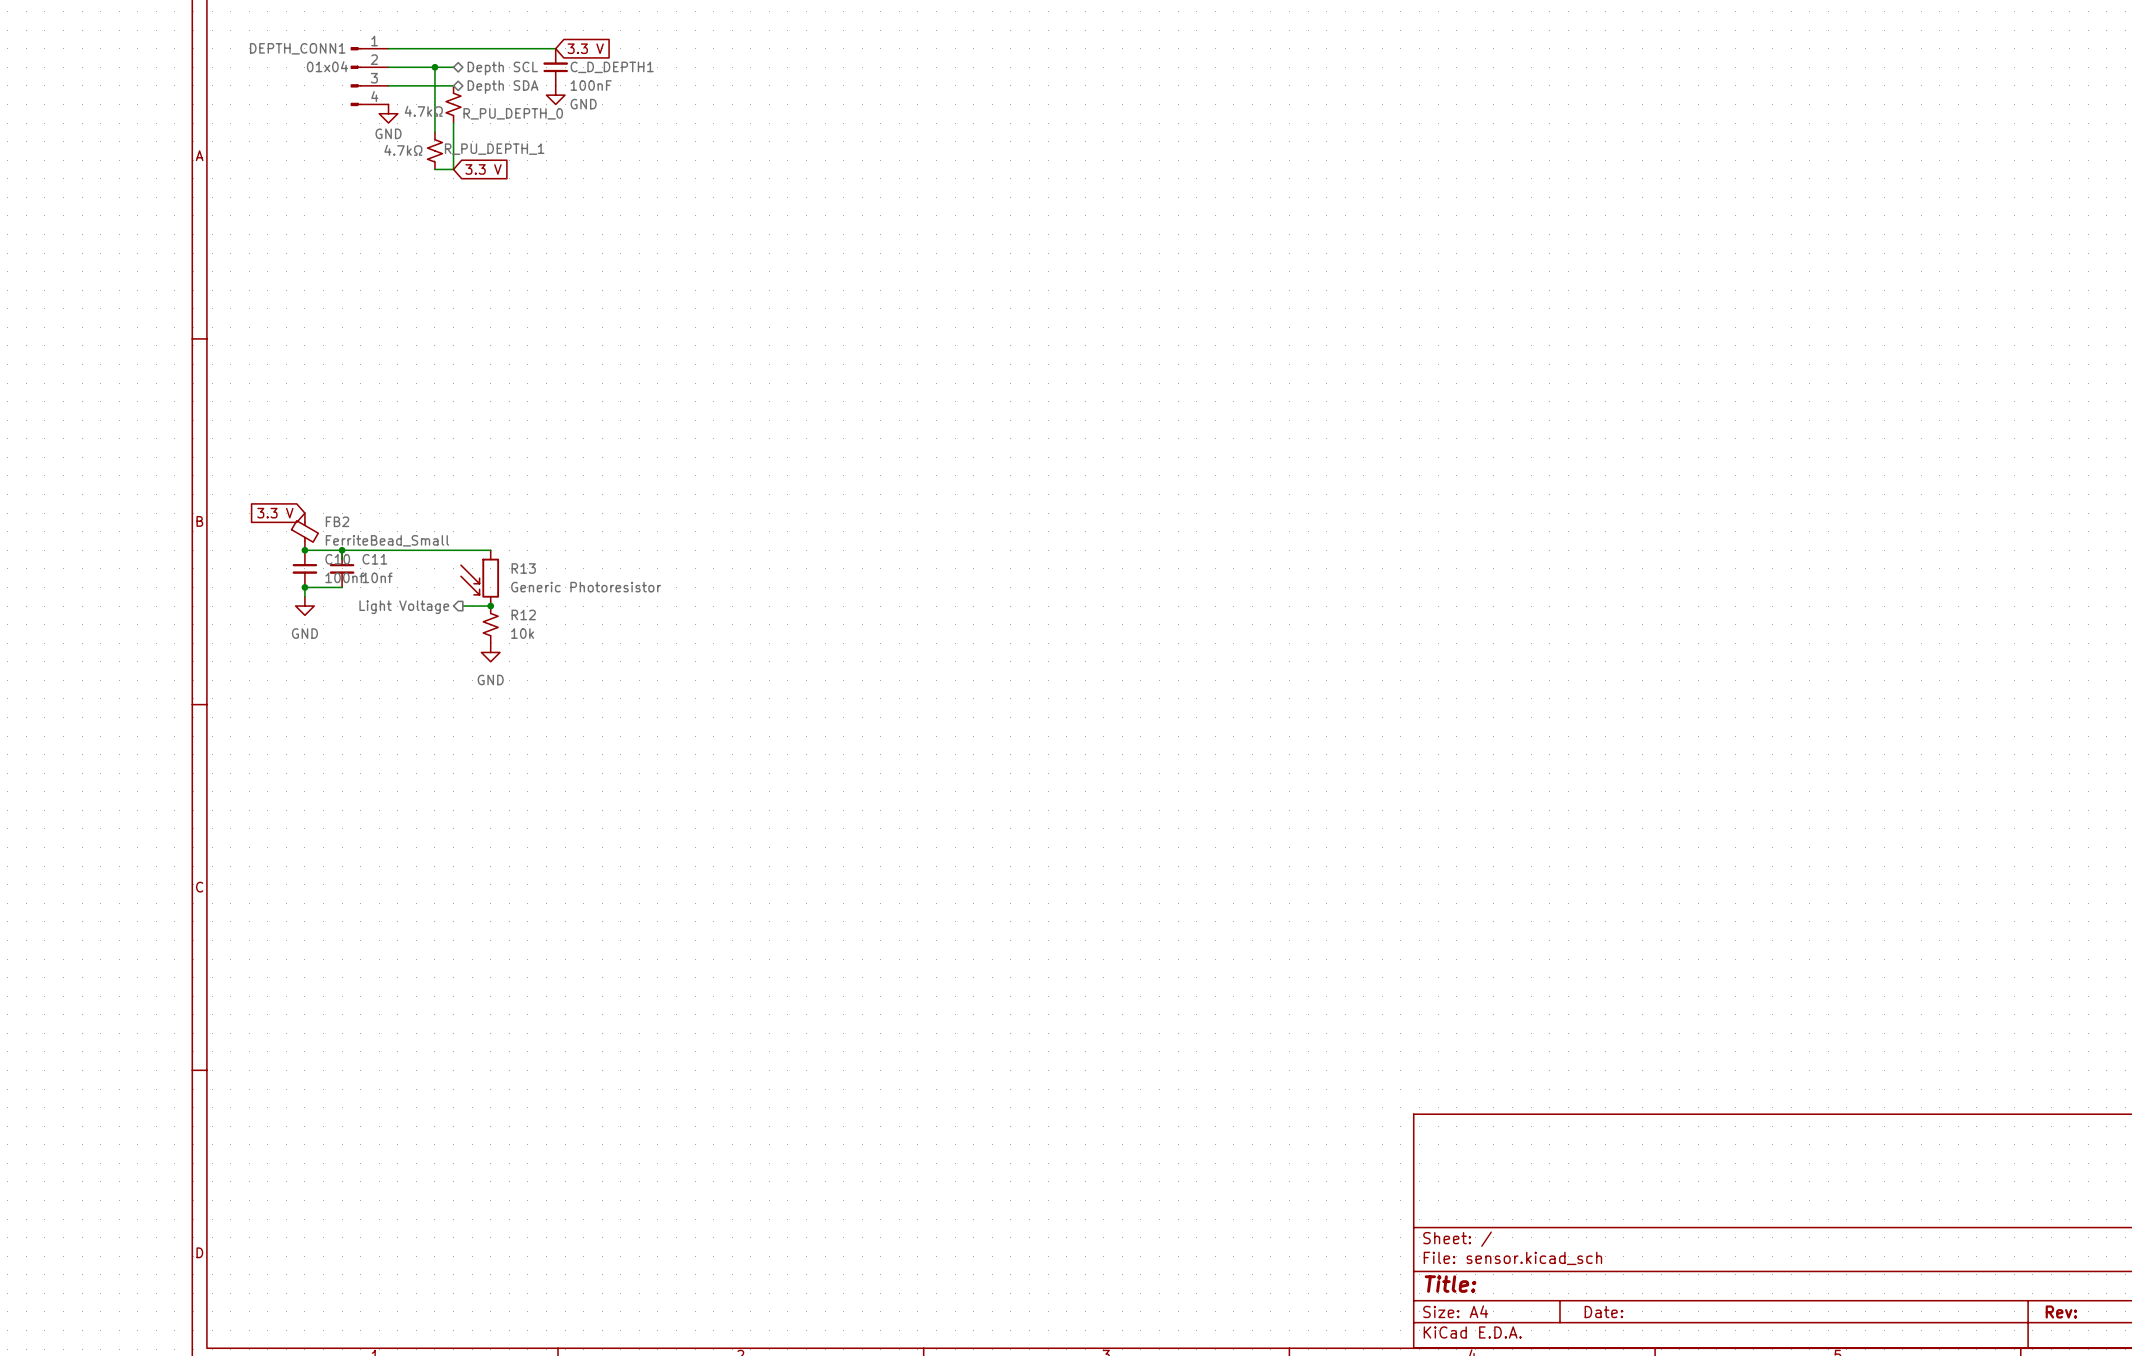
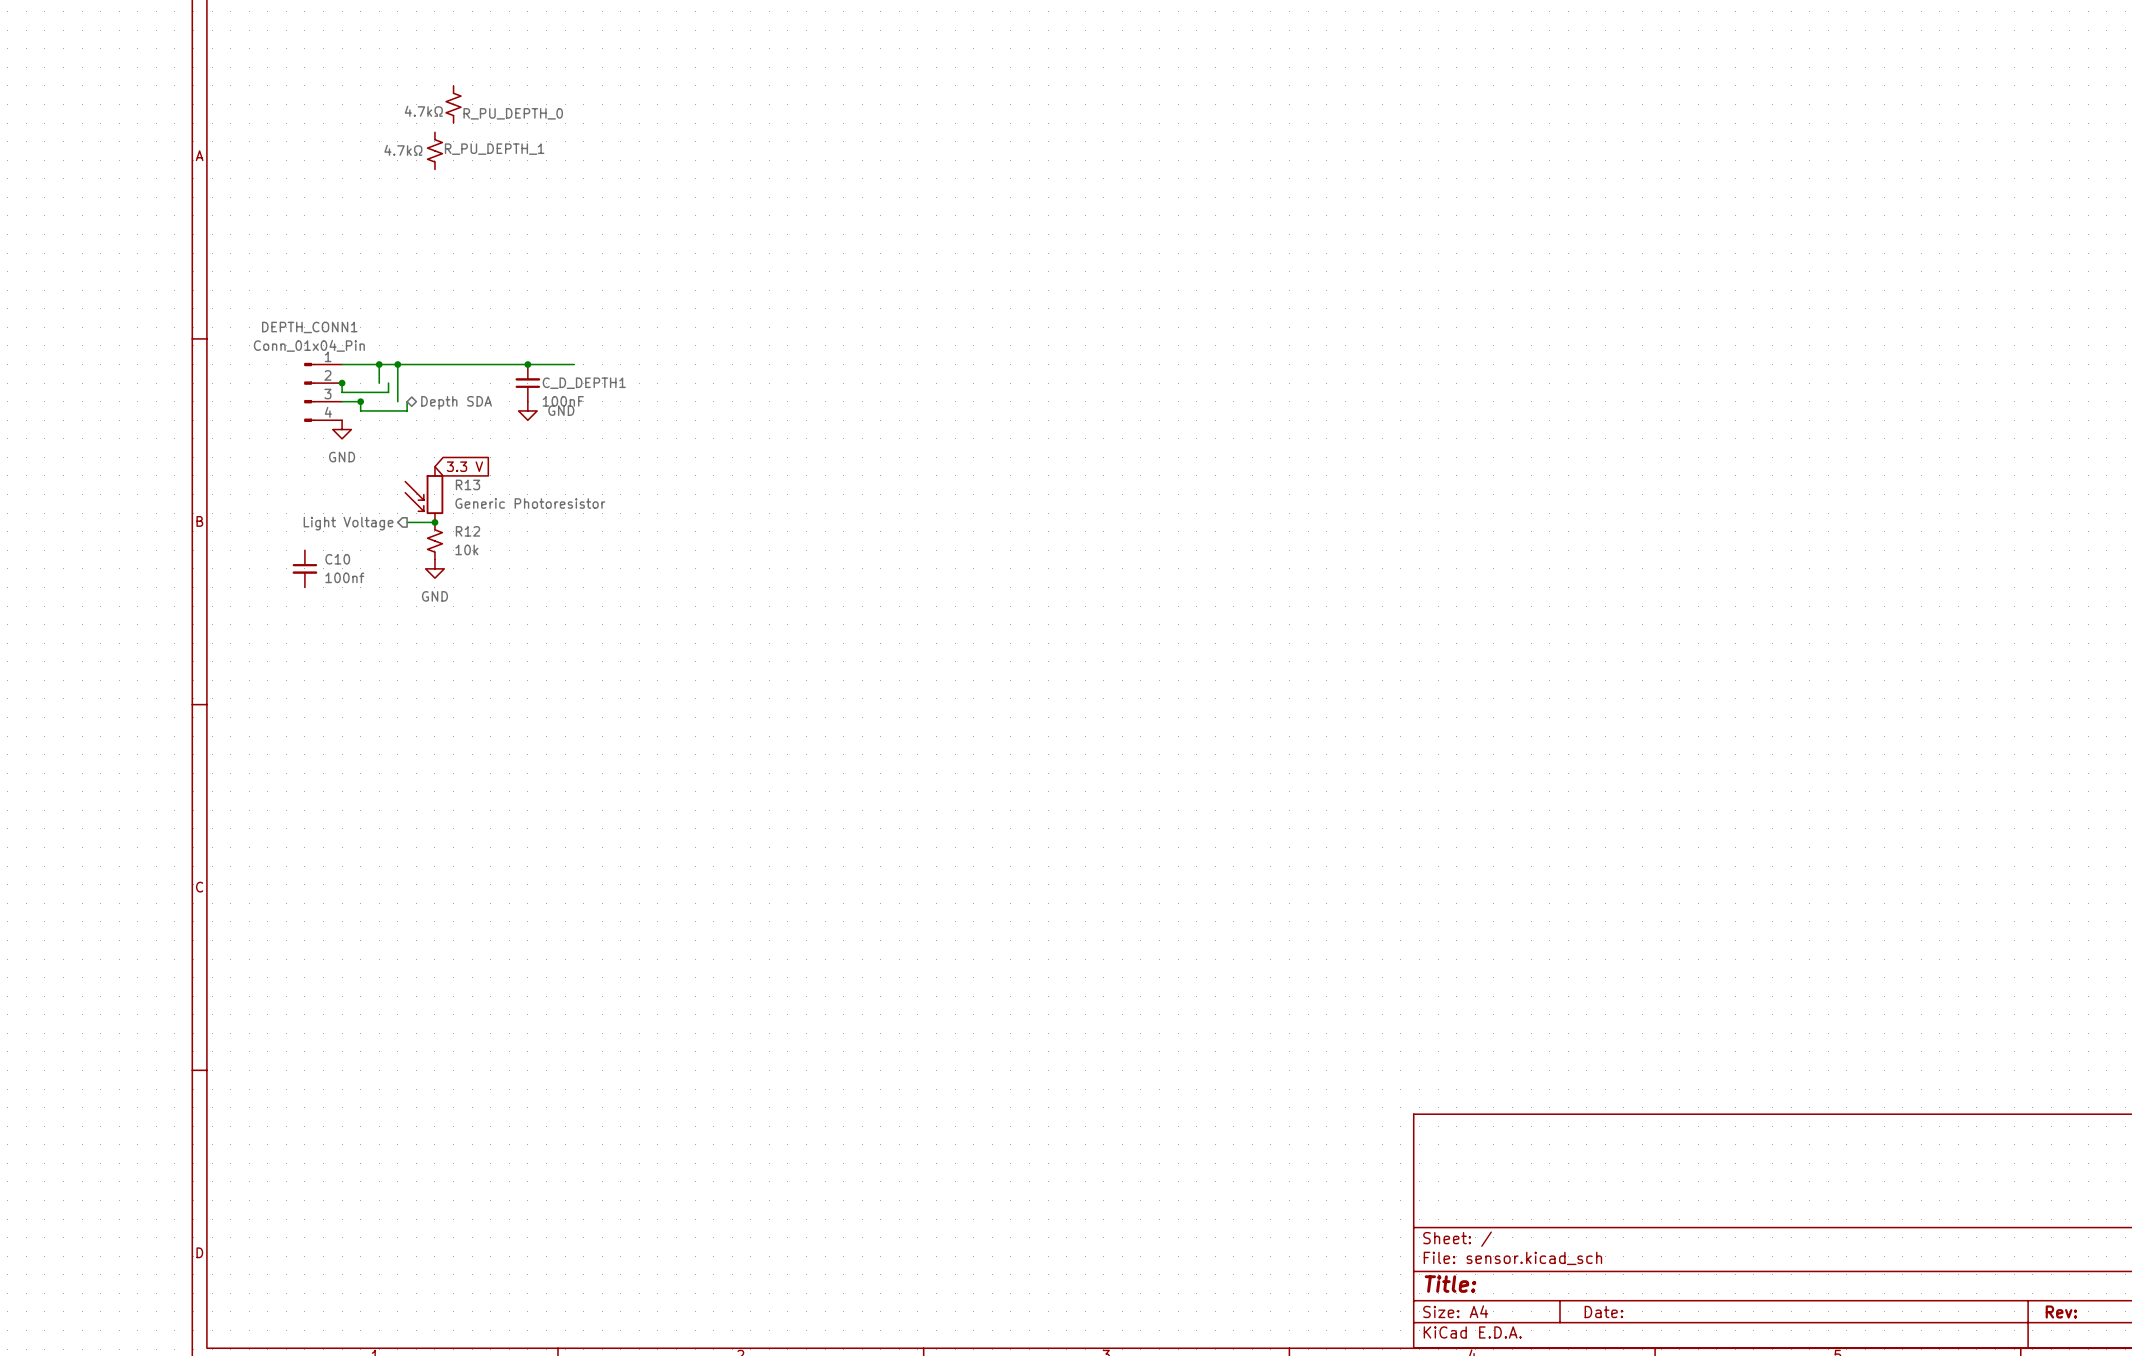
DEPTH_CONN1 name position: DEPTH_CONN1 (297, 48) -> DEPTH_CONN1 (309, 327)
wire: (388, 48) (555, 48) -> none
global label: 3.3 V (585, 48) -> none
DEPTH_CONN1 value: 01x04 (327, 66) -> Conn_01x04_Pin (309, 345)
wire: (388, 67) (453, 67) -> none
wire: (434, 67) (434, 132) -> none
junction: (434, 67) -> none
C_D_DEPTH1 position: (555, 67) -> (527, 383)
hierarchical label: Depth SCL (502, 68) -> none
DEPTH_CONN1 position: (369, 76) -> (323, 392)
wire: (388, 85) (453, 85) -> none
hierarchical label: Depth SDA (503, 87) -> none
power symbol: GND (555, 95) -> none
power symbol: GND (388, 113) -> none
wire: (453, 123) (453, 169) (434, 169) -> none
global label: 3.3 V (483, 169) -> none
wire: none -> (342, 364) (574, 364)
wire: none -> (379, 364) (379, 383)
junction: none -> (379, 364)
wire: none -> (397, 364) (397, 401)
junction: none -> (397, 364)
junction: none -> (527, 364)
wire: none -> (342, 383) (342, 392) (388, 392) (388, 383)
junction: none -> (342, 383)
wire: none -> (342, 401) (360, 401) (360, 410) (407, 410) (407, 401)
junction: none -> (360, 401)
hierarchical label: none -> Depth SDA (456, 402)
power symbol: none -> GND (527, 410)
power symbol: none -> GND (342, 429)
global label rotation: 0° (275, 513) -> 180° (464, 466)
global label position: 3.3 V (275, 513) -> 3.3 V (464, 466)
junction: none -> (434, 522)
FB2: FerriteBead_Small (304, 531) -> none
wire: (304, 550) (490, 550) -> none
junction: (304, 550) -> none
wire: (342, 550) (342, 559) -> none
junction: (342, 550) -> none
C11: 10nf (342, 568) -> none
power symbol: none -> GND (434, 568)
R13 position: (480, 578) -> (424, 494)
junction: (304, 587) -> none
wire: (342, 587) (304, 587) (304, 596) -> none
power symbol: GND (304, 606) -> none
wire: (462, 606) (490, 606) -> (407, 522) (434, 522)
junction: (490, 606) -> none
hierarchical label position: Light Voltage (404, 607) -> Light Voltage (348, 523)
R12 position: (490, 624) -> (434, 541)
power symbol: GND (490, 652) -> none

